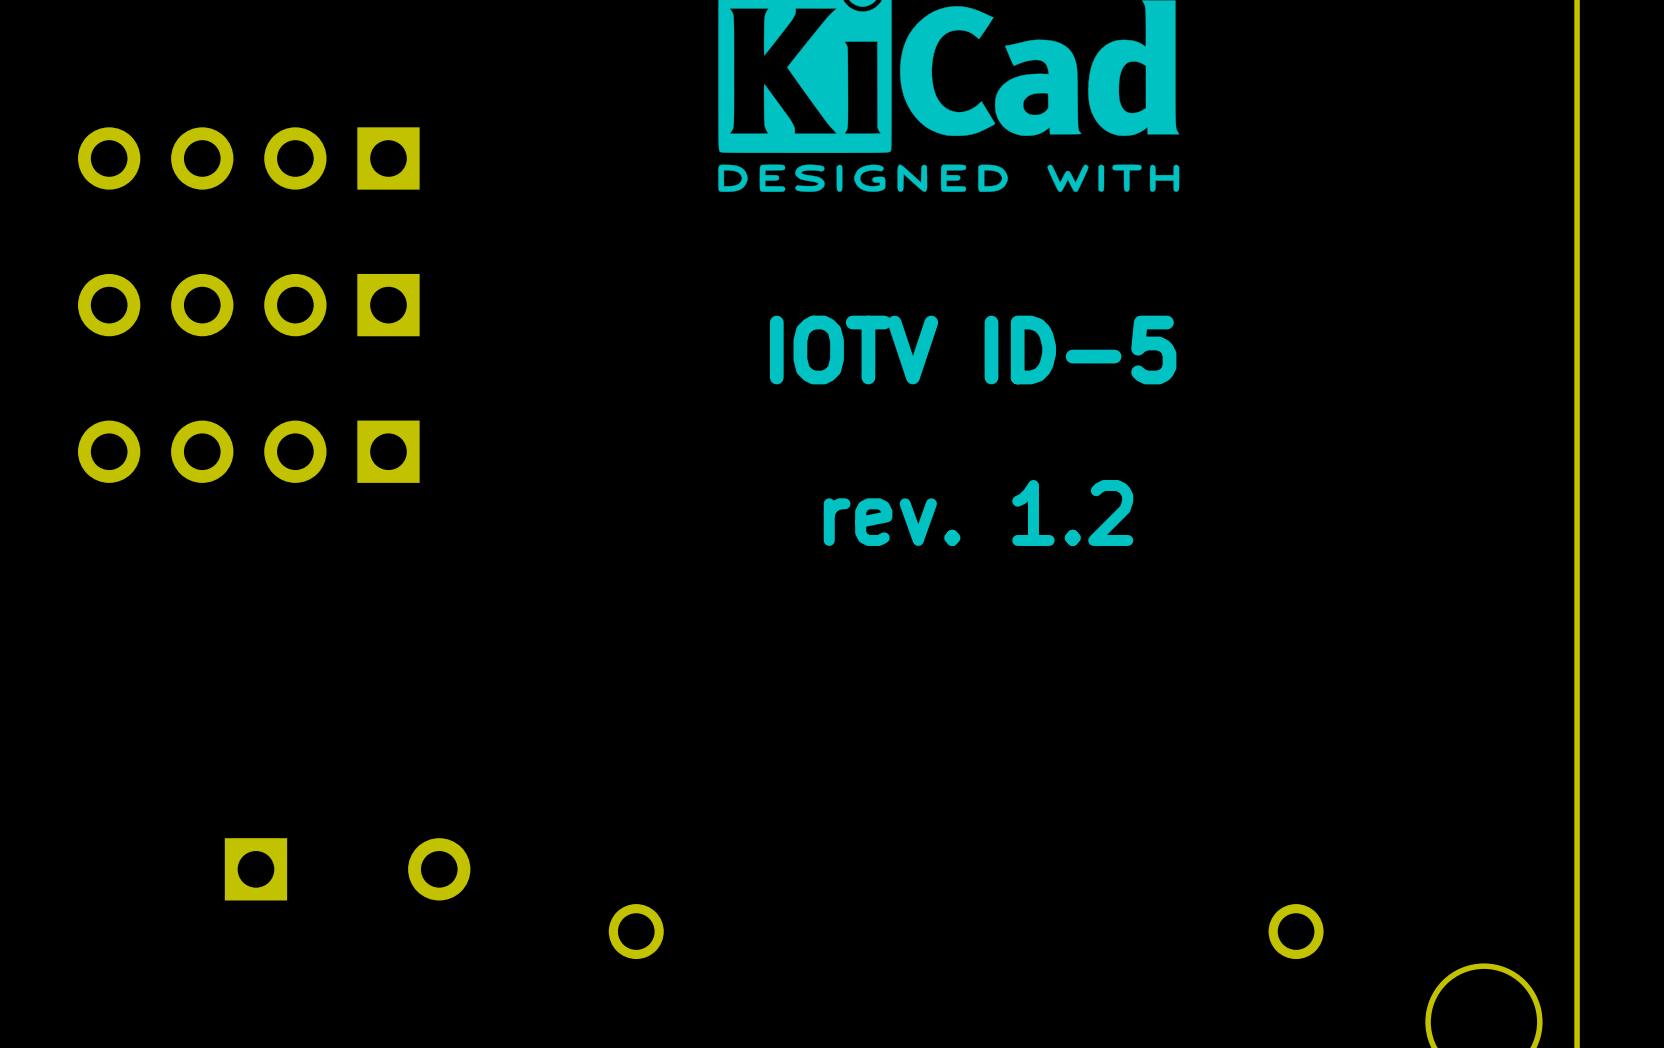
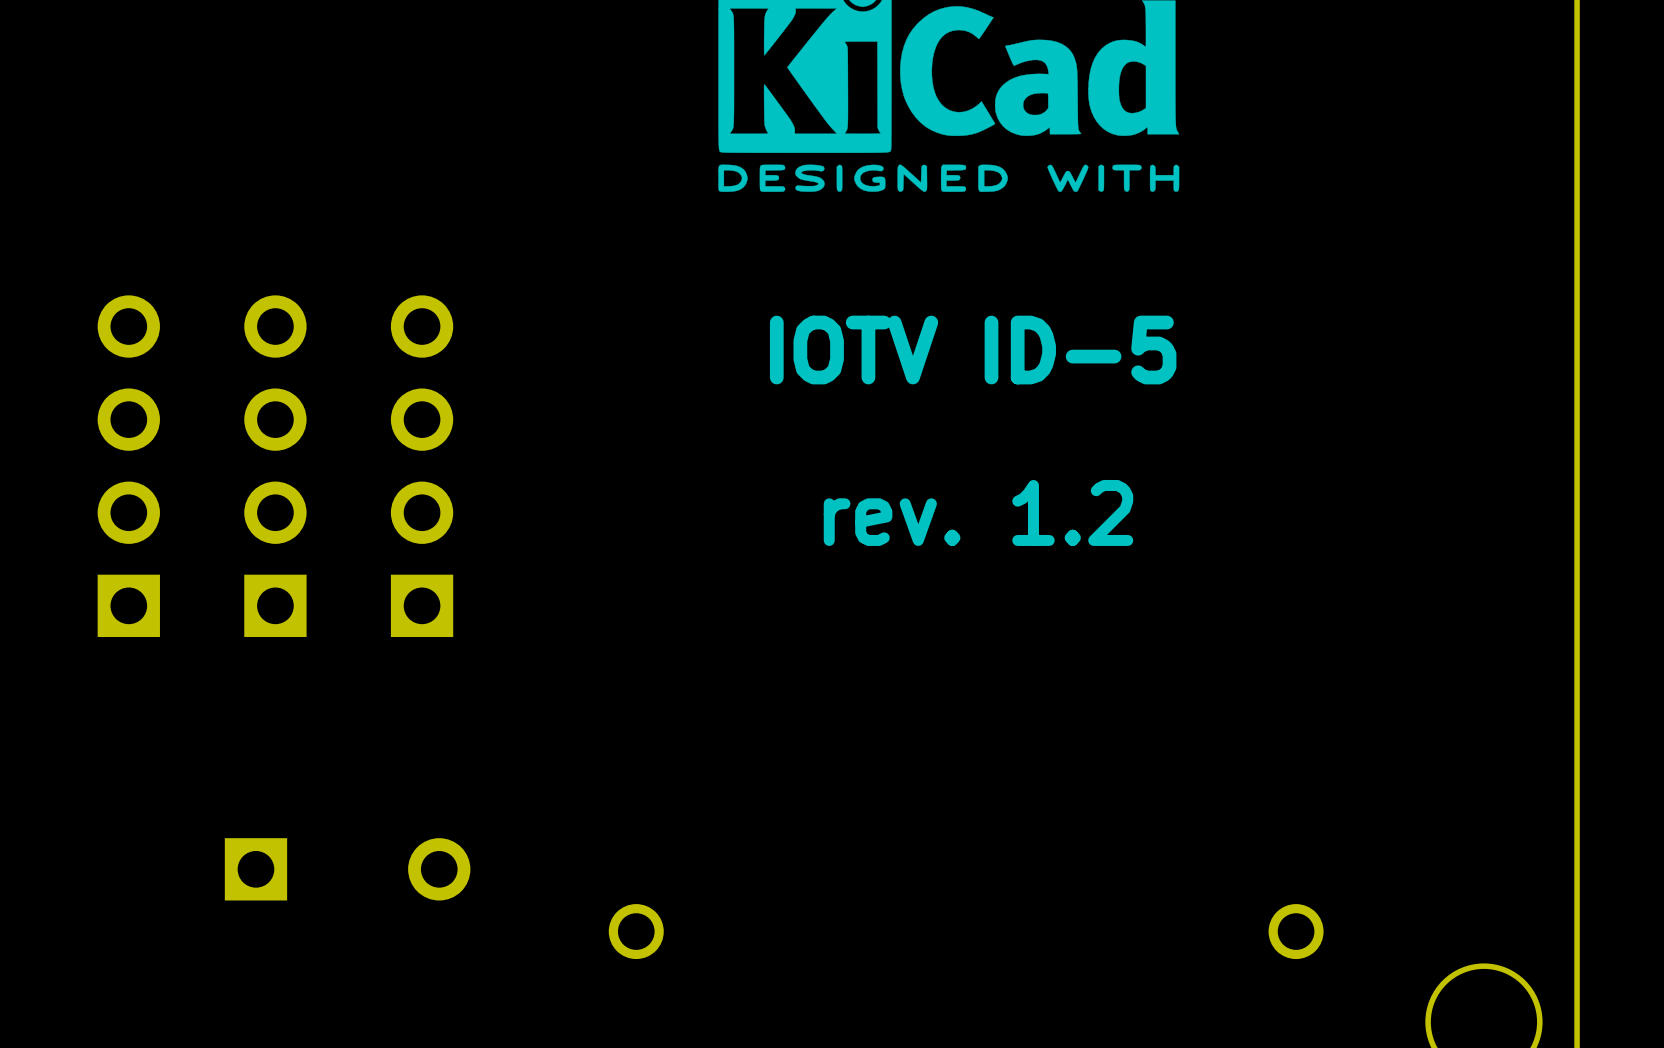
part: (248, 158) -> none
part: (248, 305) -> none
part rotation: 0° (248, 451) -> 90° clockwise (275, 466)
part: none -> (128, 466)
part: none -> (422, 466)

